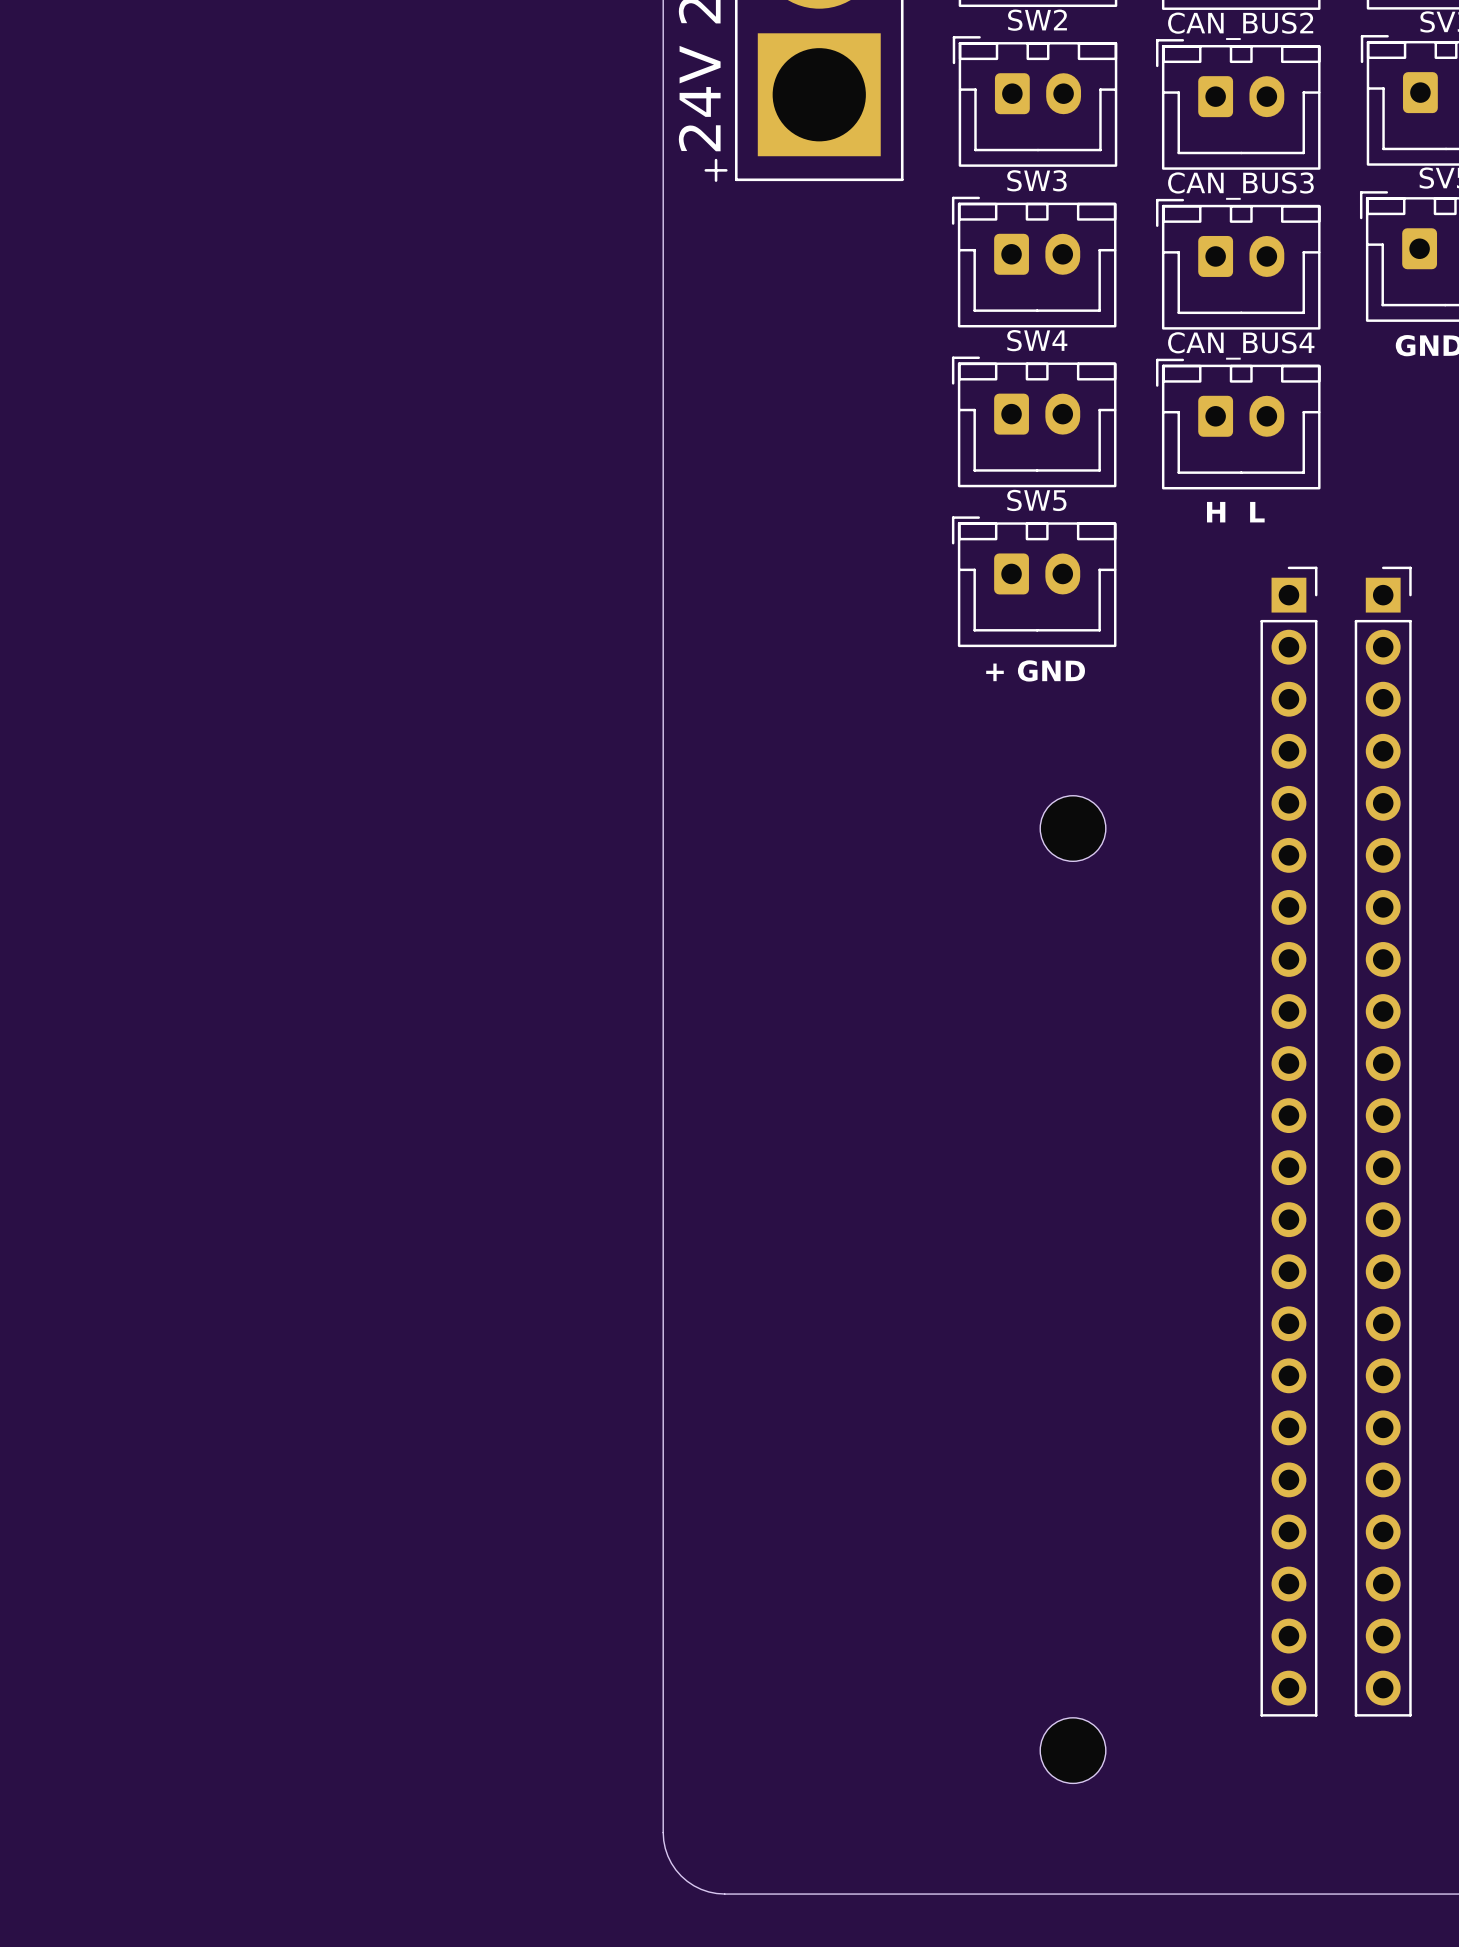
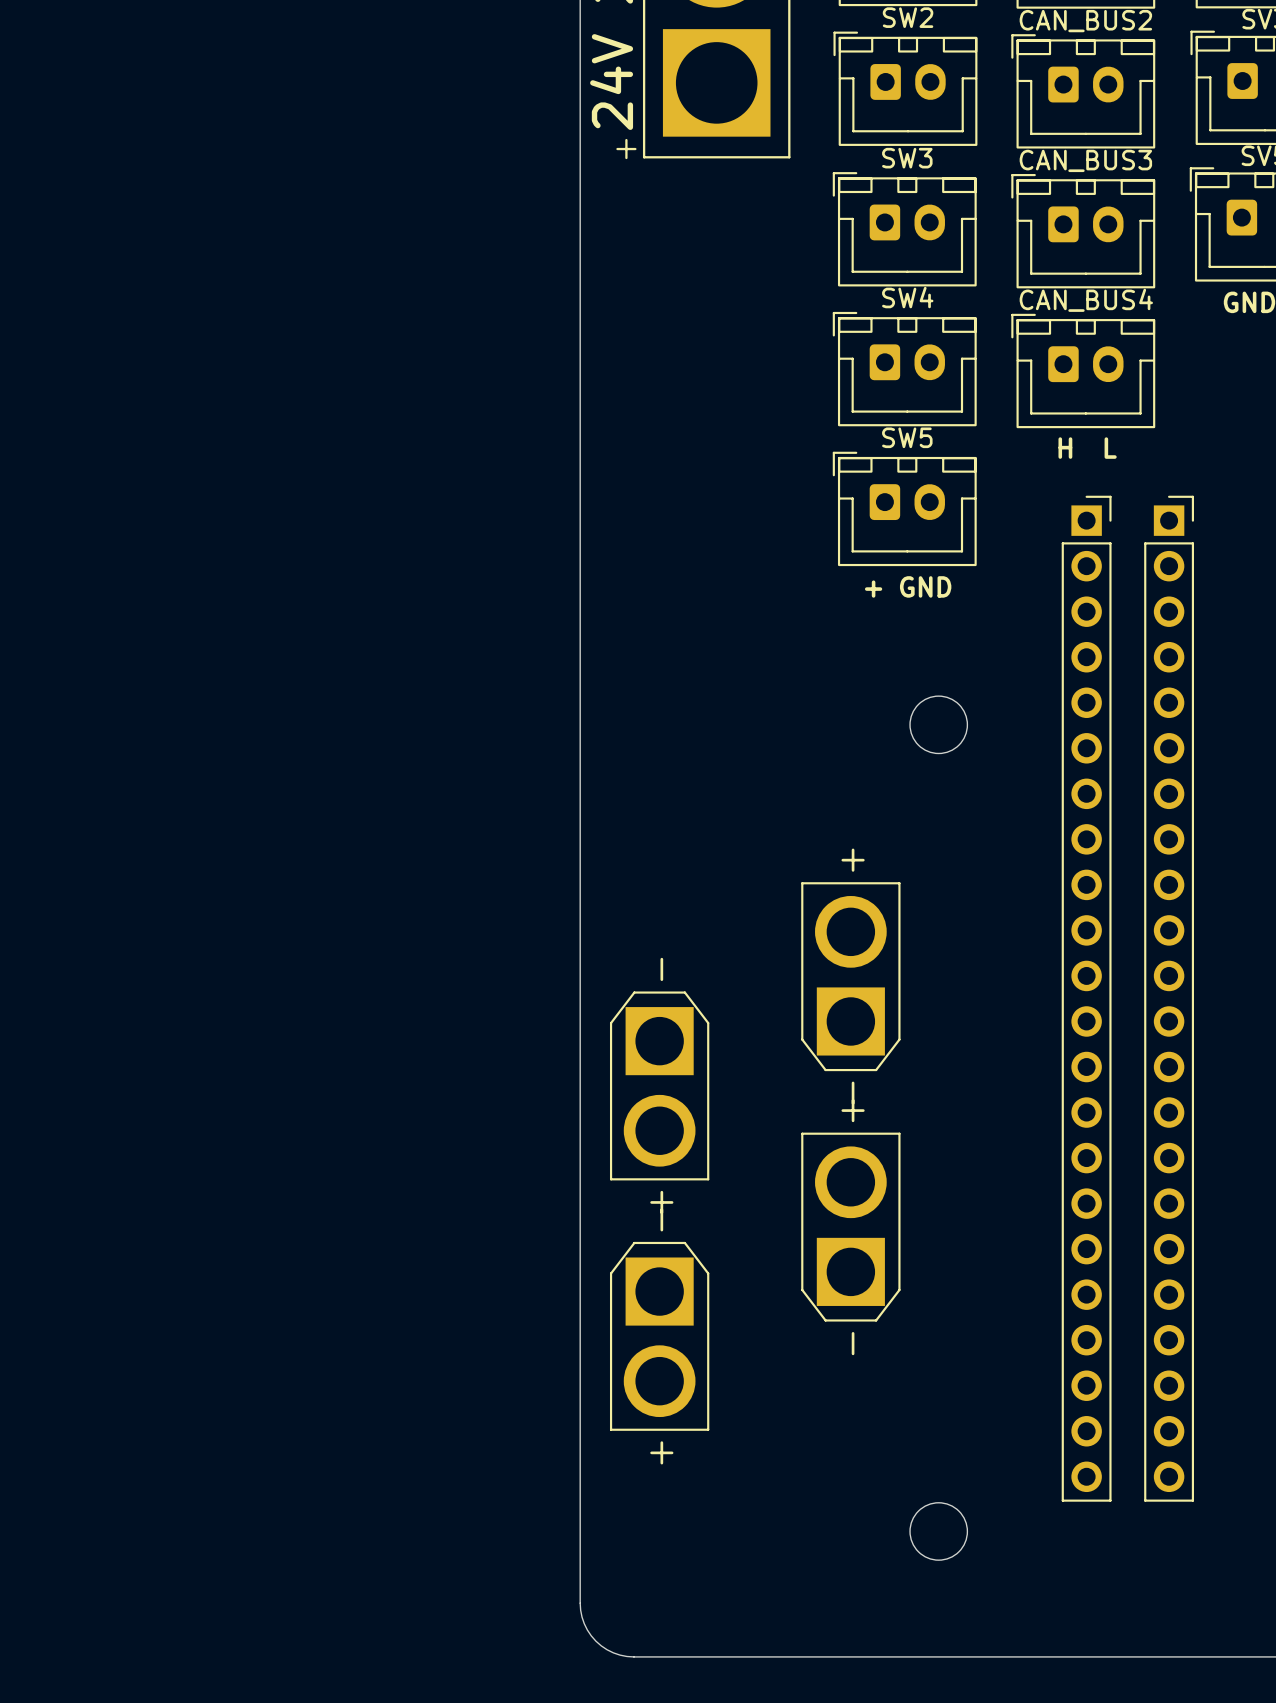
part: none -> (850, 976)
part: none -> (1086, 998)
part: (1288, 1141) -> none
part: none -> (1169, 998)
part: (1383, 1141) -> none
part: none -> (659, 1085)
part: none -> (850, 1227)
part: none -> (659, 1336)

